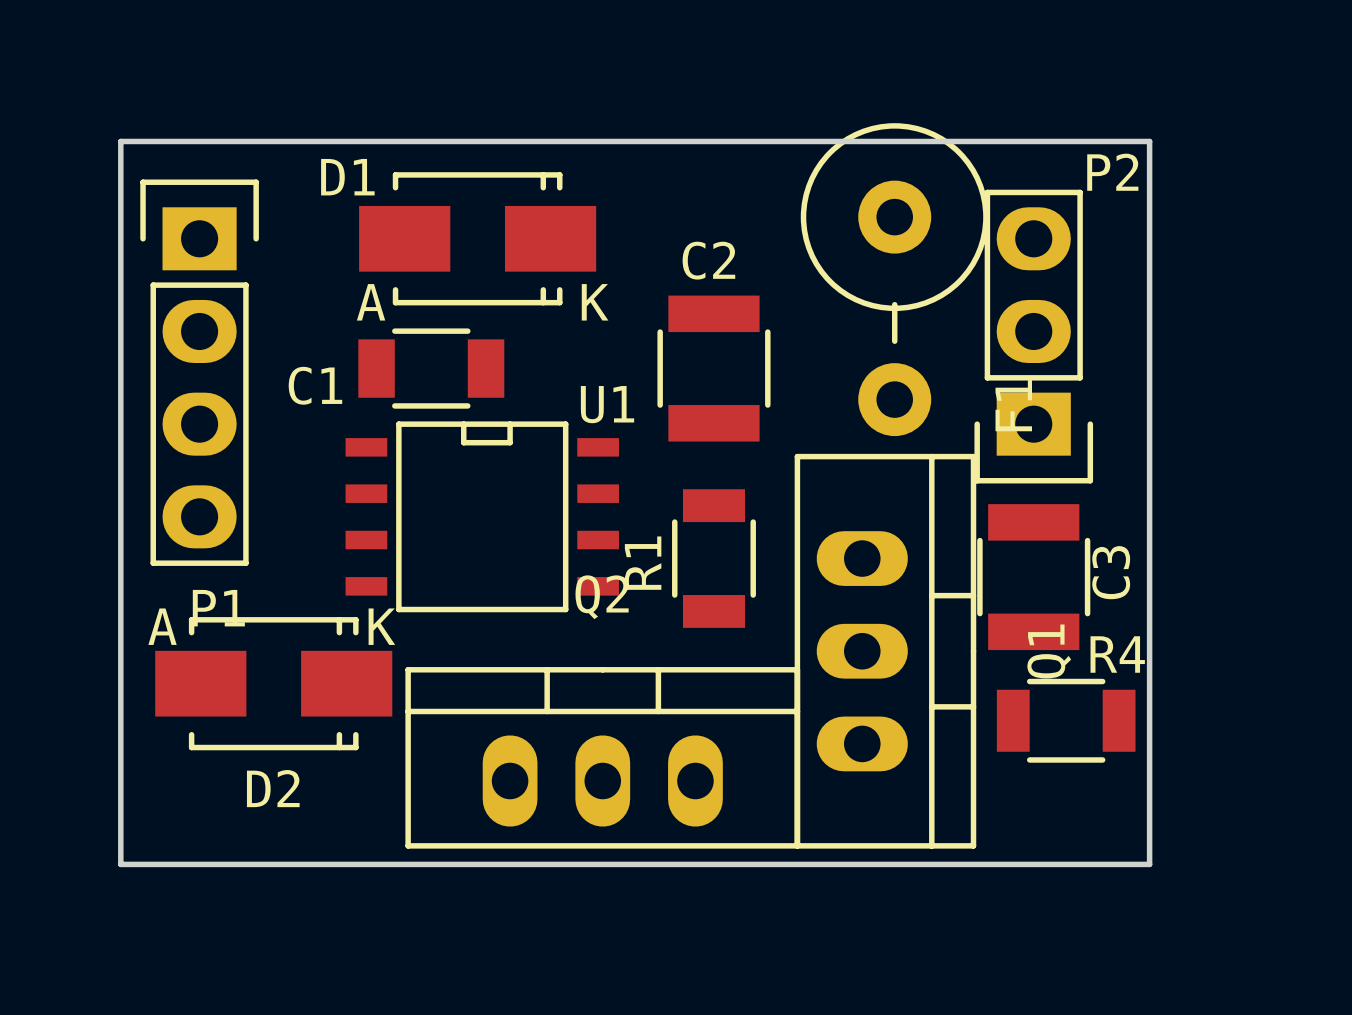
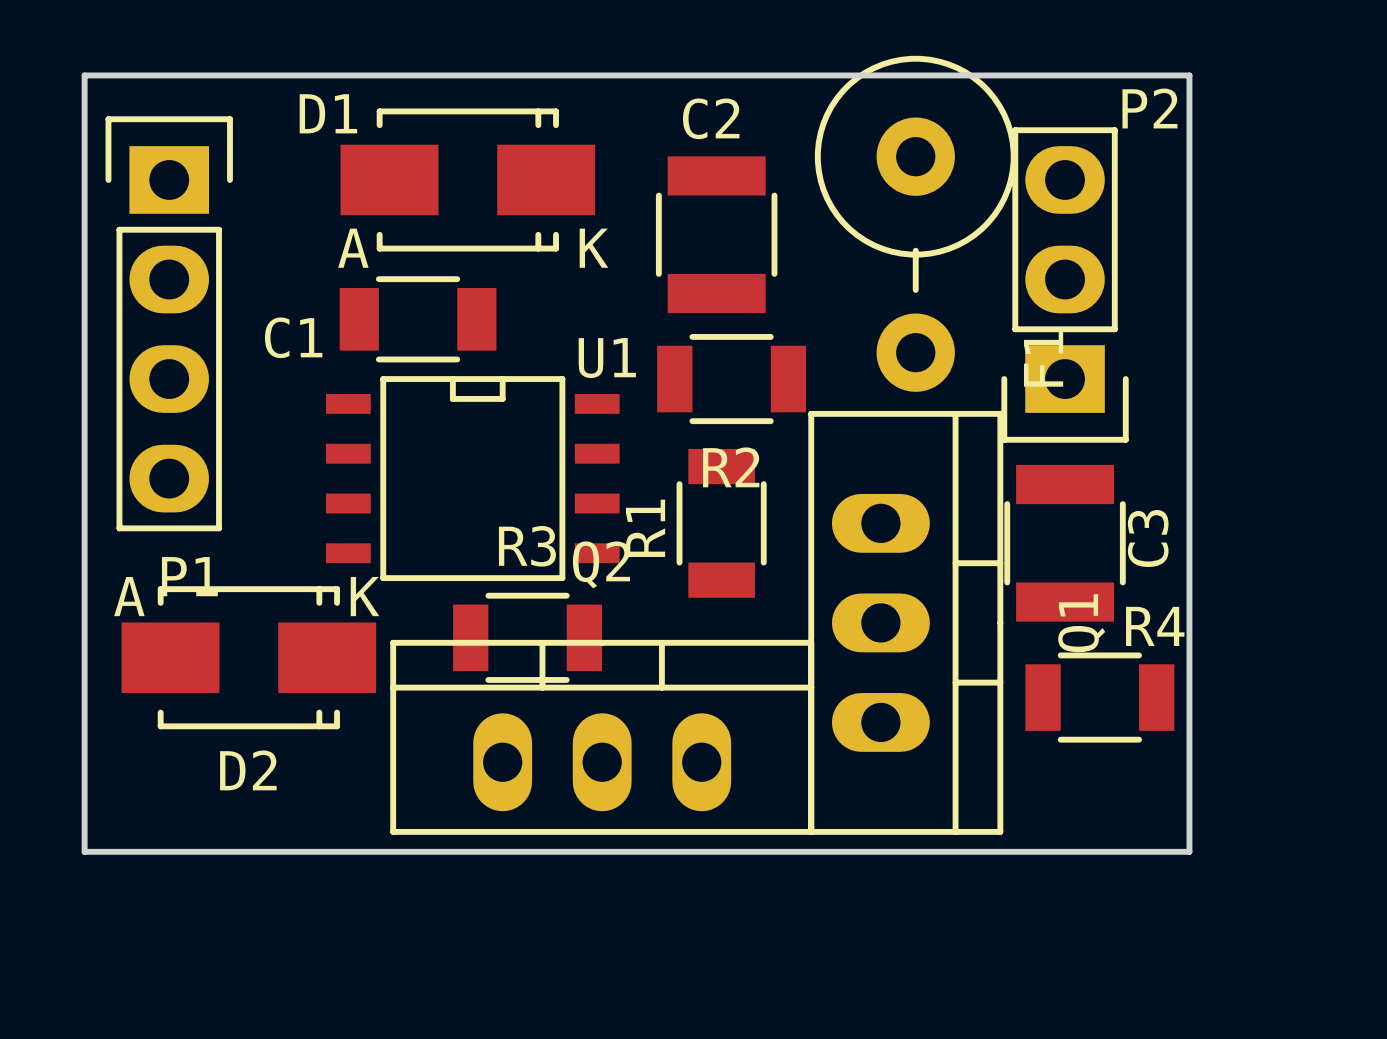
C2 position: (713, 368) -> (716, 234)
R2: none -> (731, 379)
R3: none -> (527, 637)

